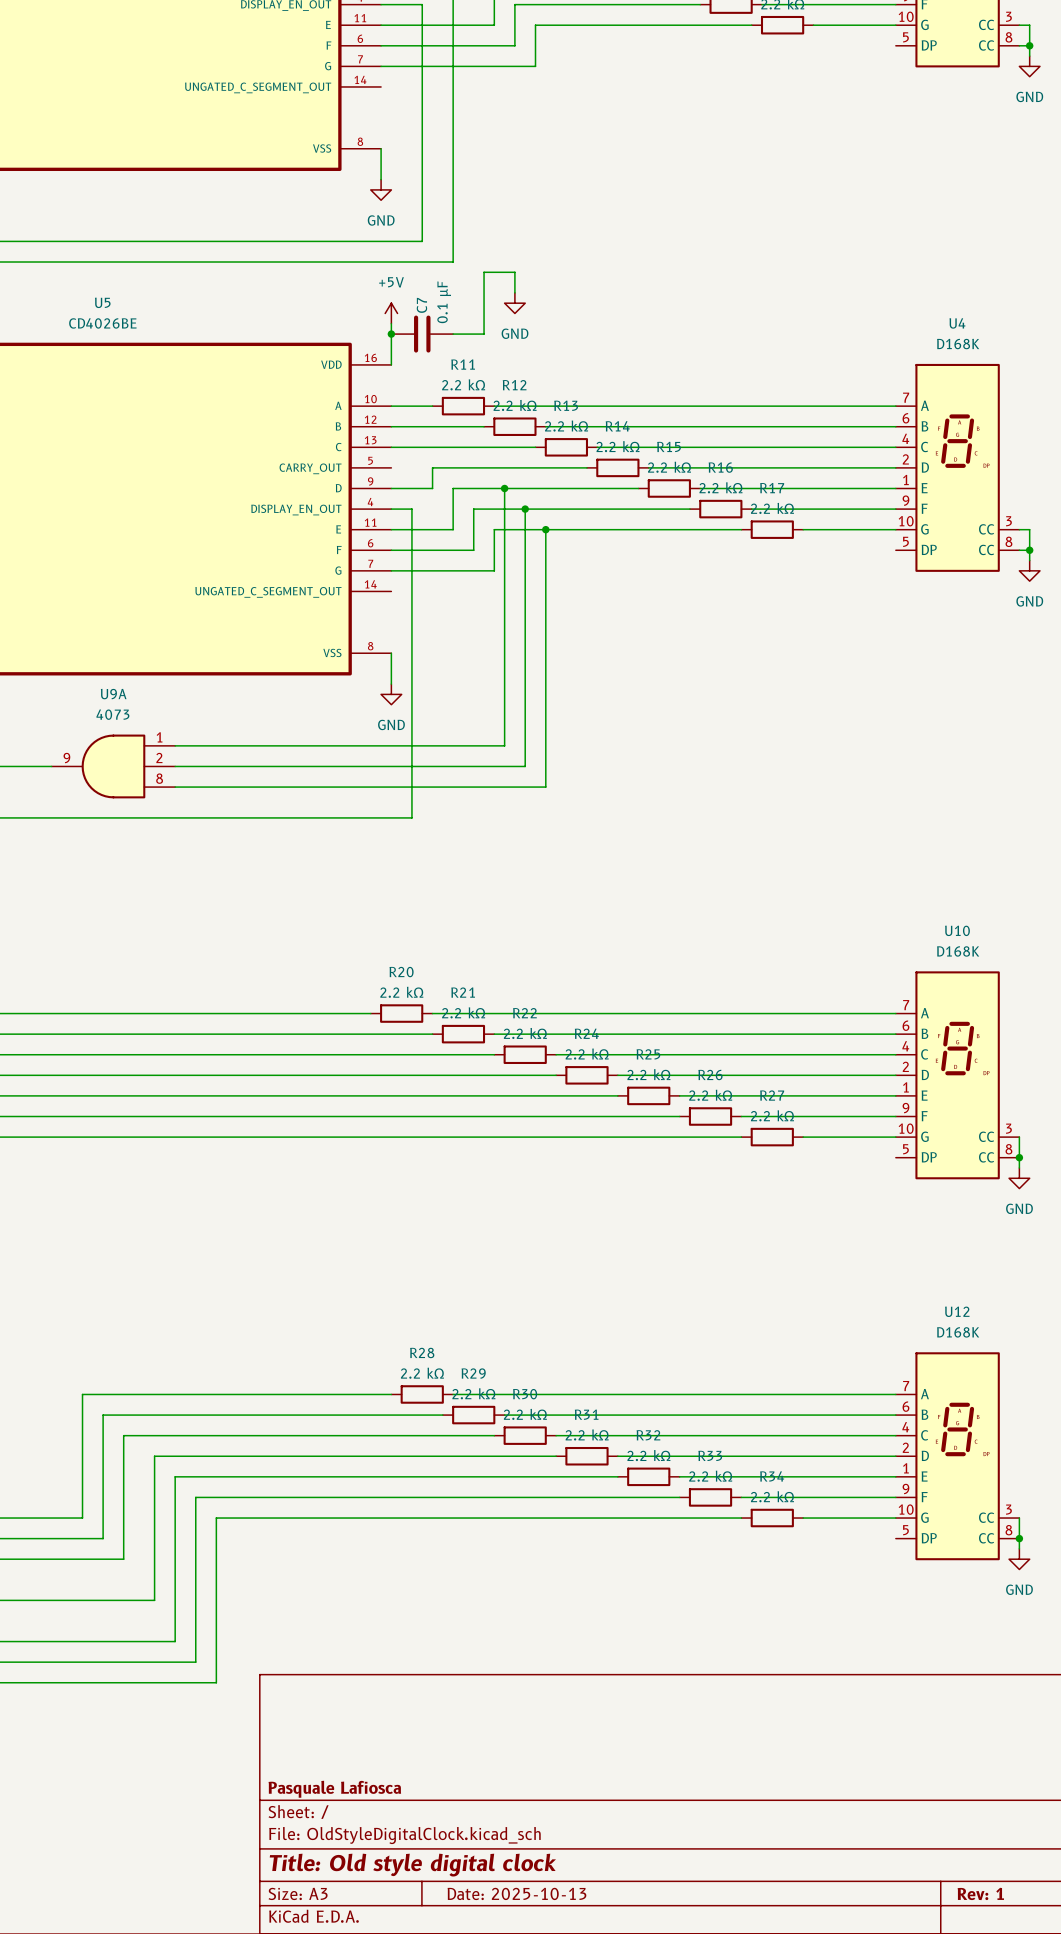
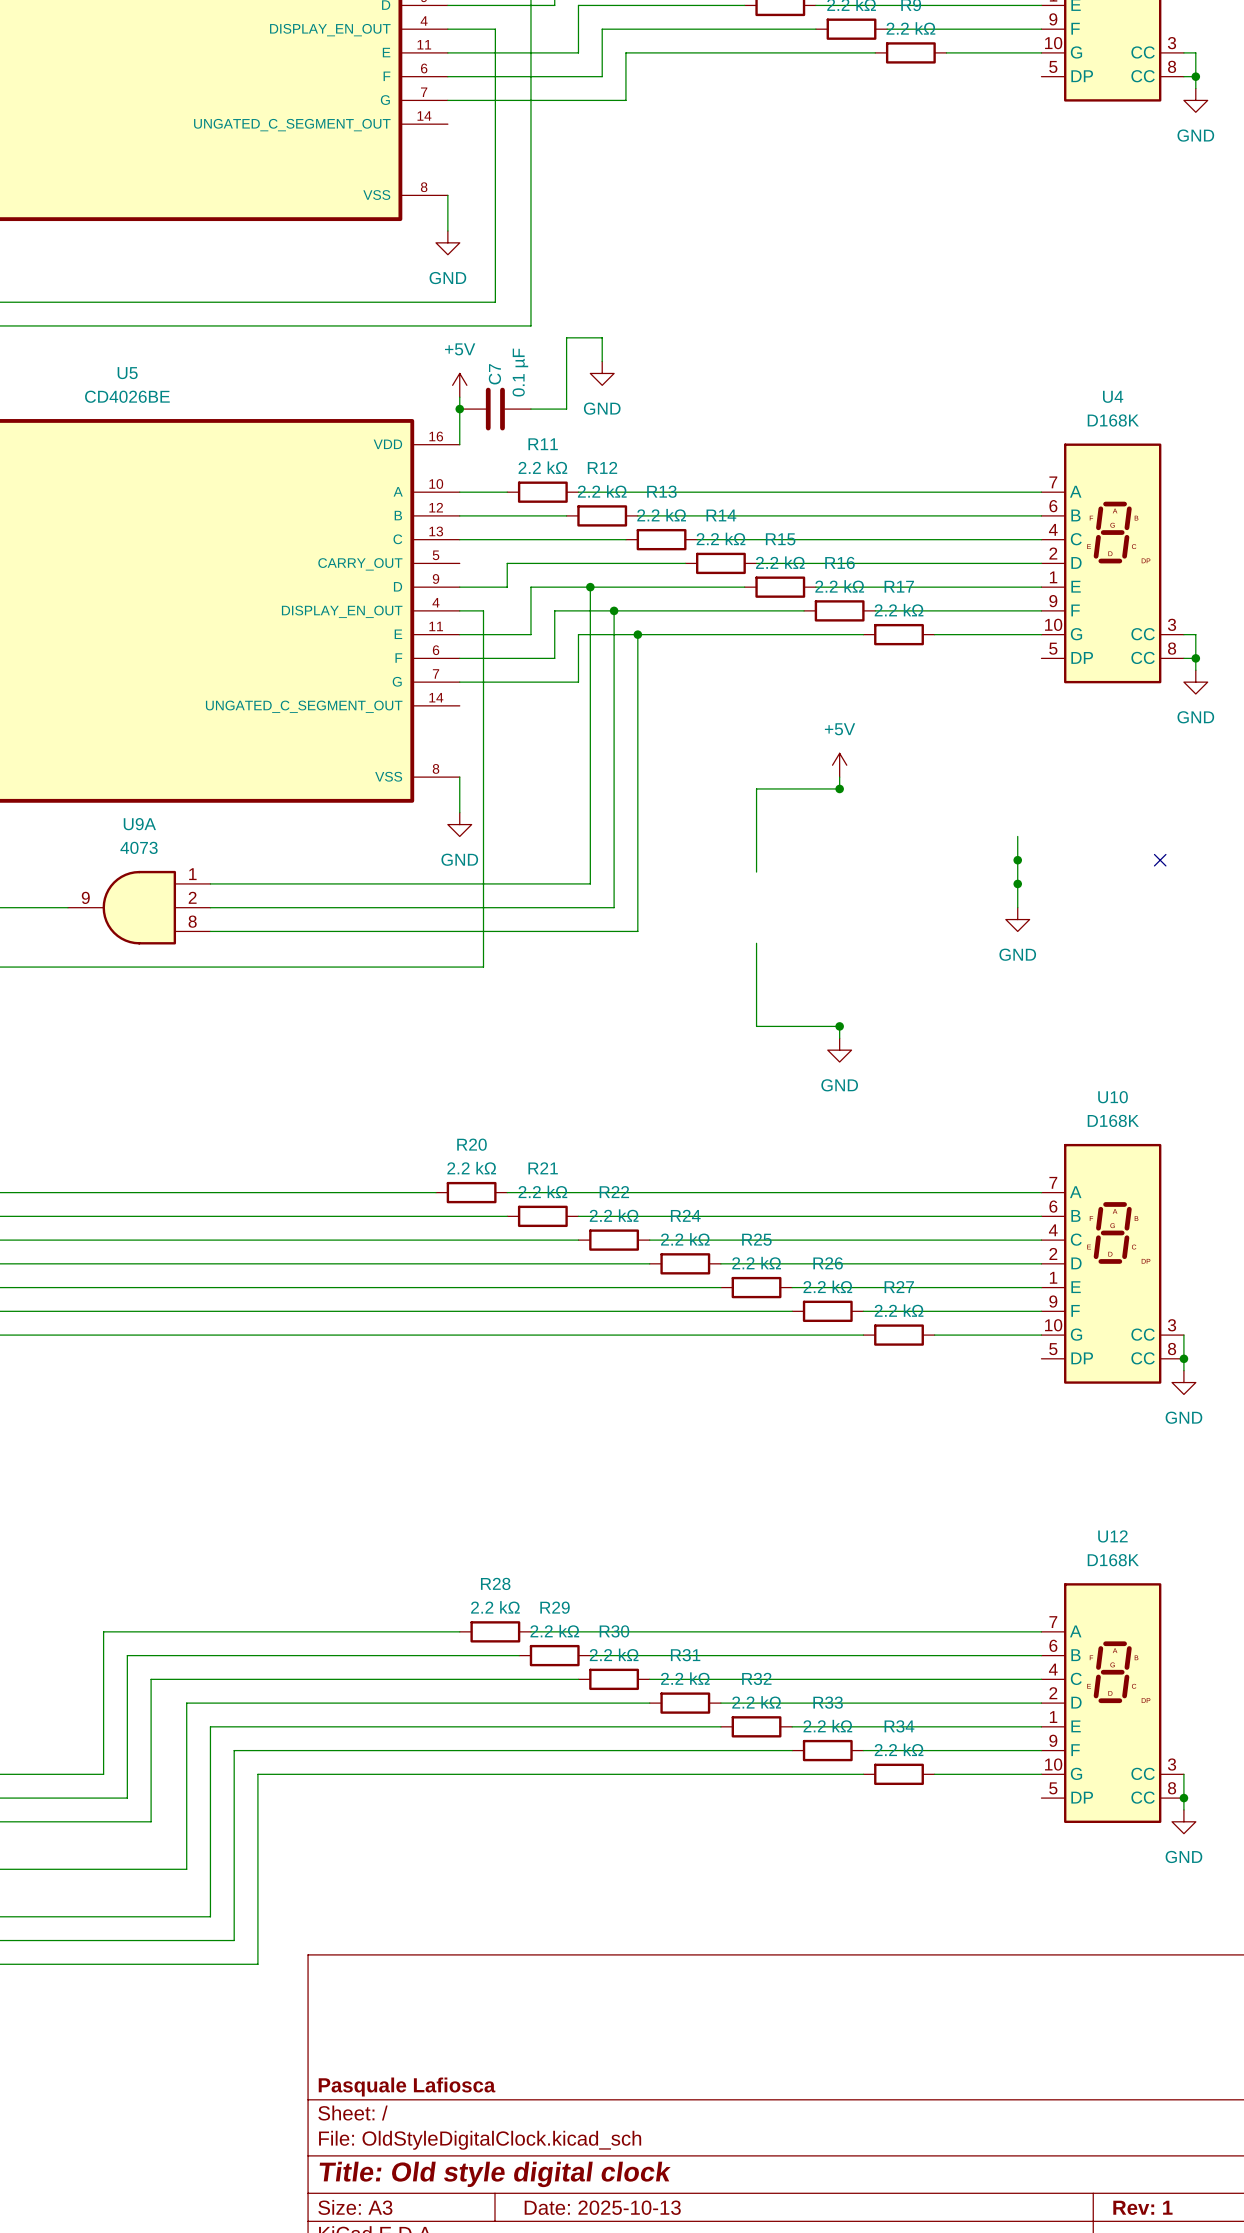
power symbol: none -> +5V (839, 765)
wire: none -> (839, 777) (839, 788) (756, 788) (756, 872)
junction: none -> (839, 788)
wire: none -> (1017, 836) (1017, 907)
junction: none -> (1017, 860)
no-connect mark: none -> (1160, 860)
junction: none -> (1017, 883)
power symbol: none -> GND (1017, 919)
wire: none -> (756, 943) (756, 1026) (839, 1026) (839, 1038)
junction: none -> (839, 1026)
power symbol: none -> GND (839, 1050)

